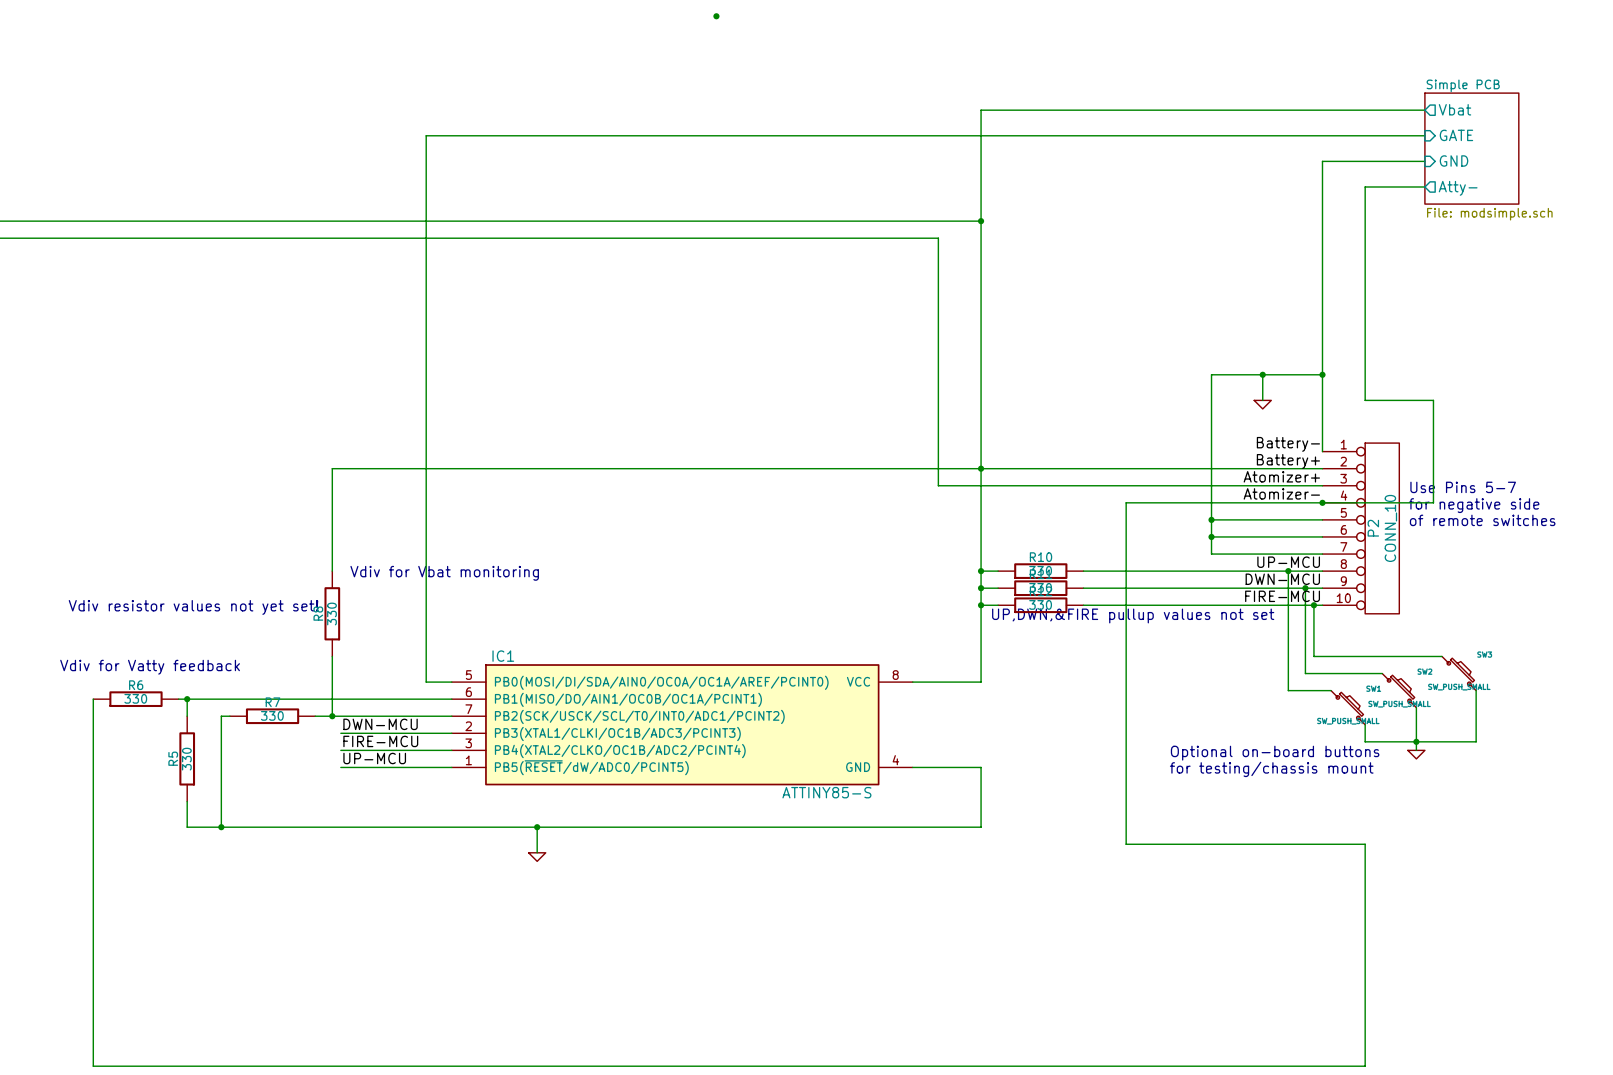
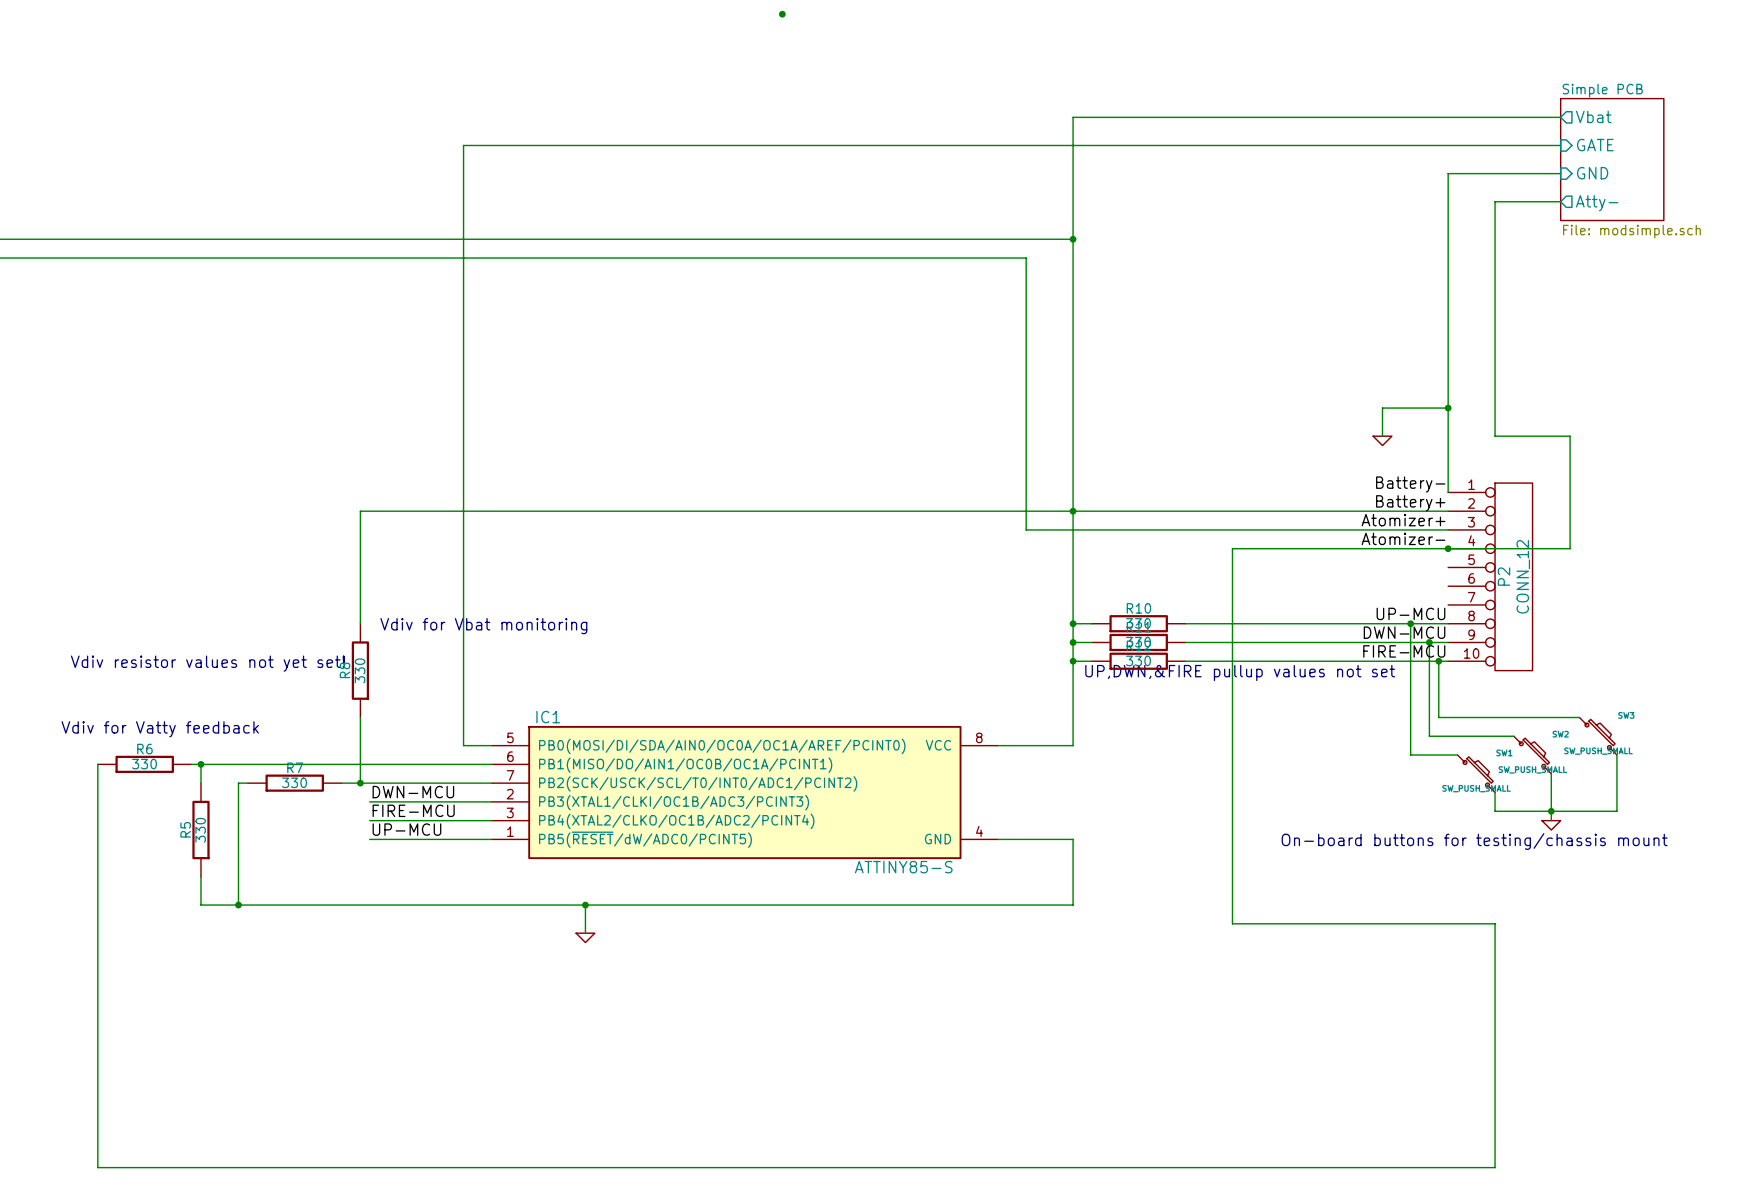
wire: (1262, 374) (1211, 374) (1211, 554) (1322, 554) -> none
junction: (1262, 374) -> none
text: Use Pins 5-7 (1463, 487) -> none
text: for negative side (1474, 505) -> none
wire: (1211, 519) (1322, 519) -> none
junction: (1211, 519) -> none
text: of remote switches (1482, 520) -> none
P2 value: CONN_10 (1390, 528) -> CONN_12 (1523, 576)
wire: (1211, 536) (1322, 536) -> none
junction: (1211, 536) -> none
text: Optional on-board buttons (1275, 753) -> none
text: for testing/chassis mount (1271, 769) -> On-board buttons for testing/chassis mount (1474, 841)

